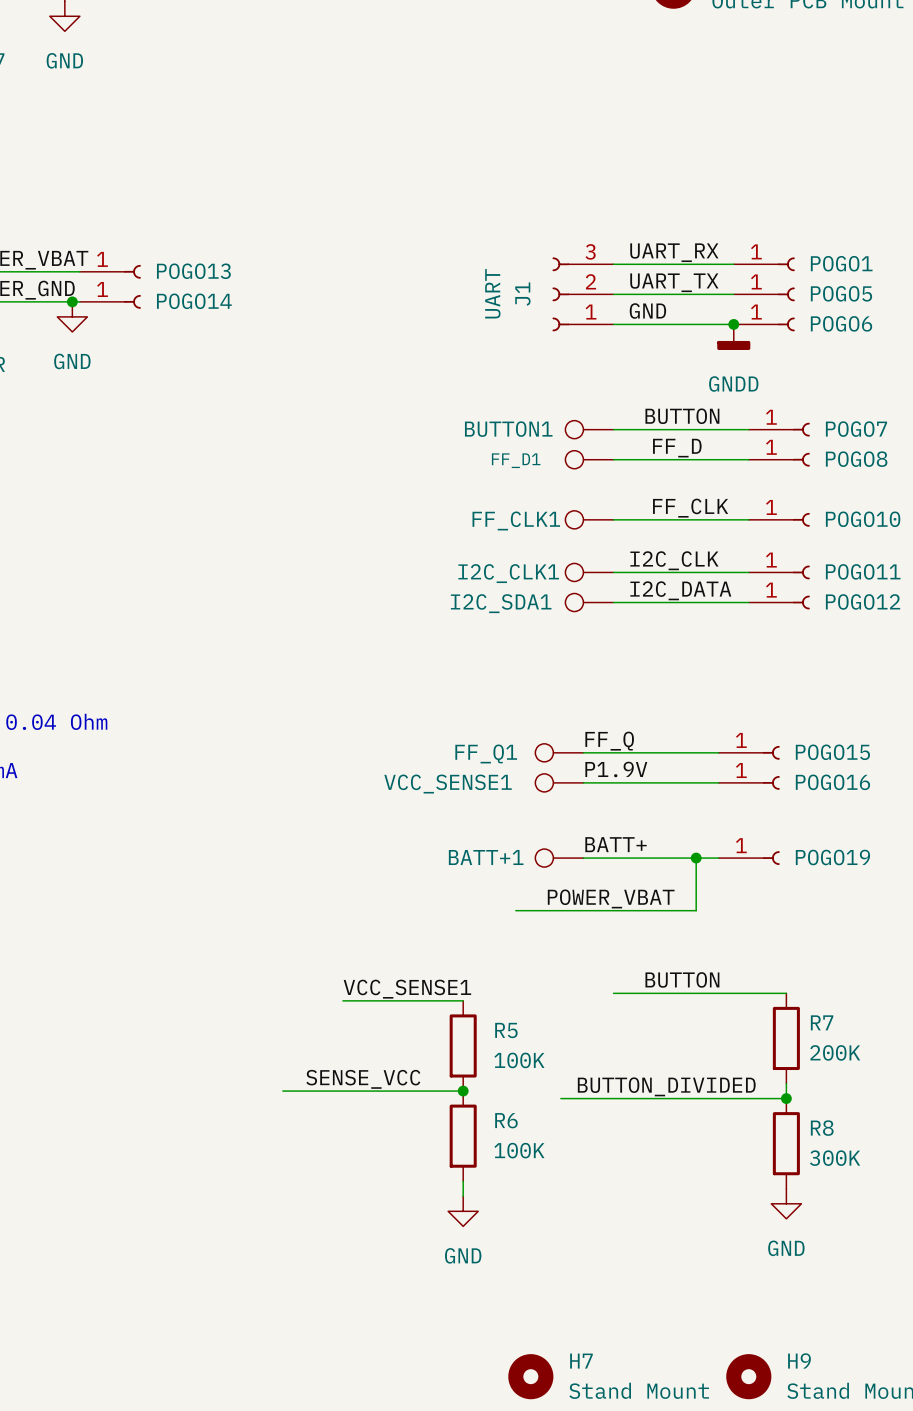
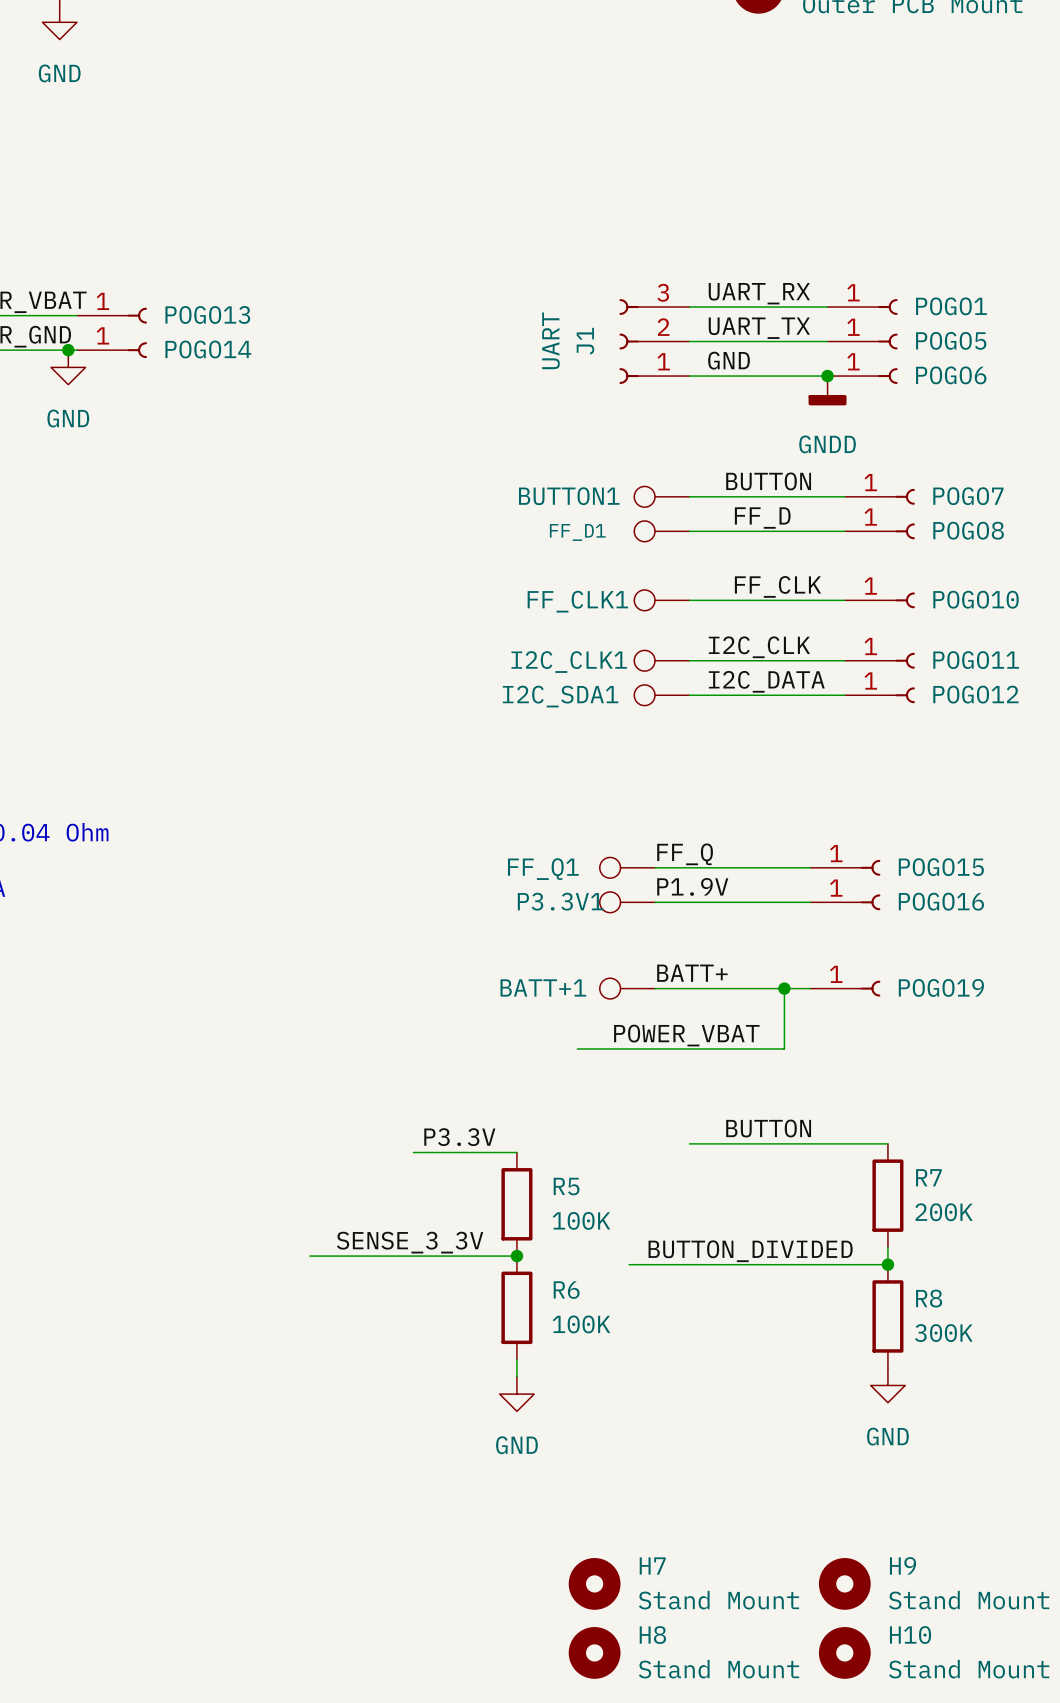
VCC_SENSE1 name: VCC_SENSE1 (448, 784) -> P3.3V1 (560, 901)
label: none -> P3.3V (459, 1137)
label: VCC_SENSE1 (407, 989) -> none
wire: (342, 1000) (373, 1000) -> none
label: SENSE_VCC (363, 1079) -> SENSE_3_3V (410, 1242)

